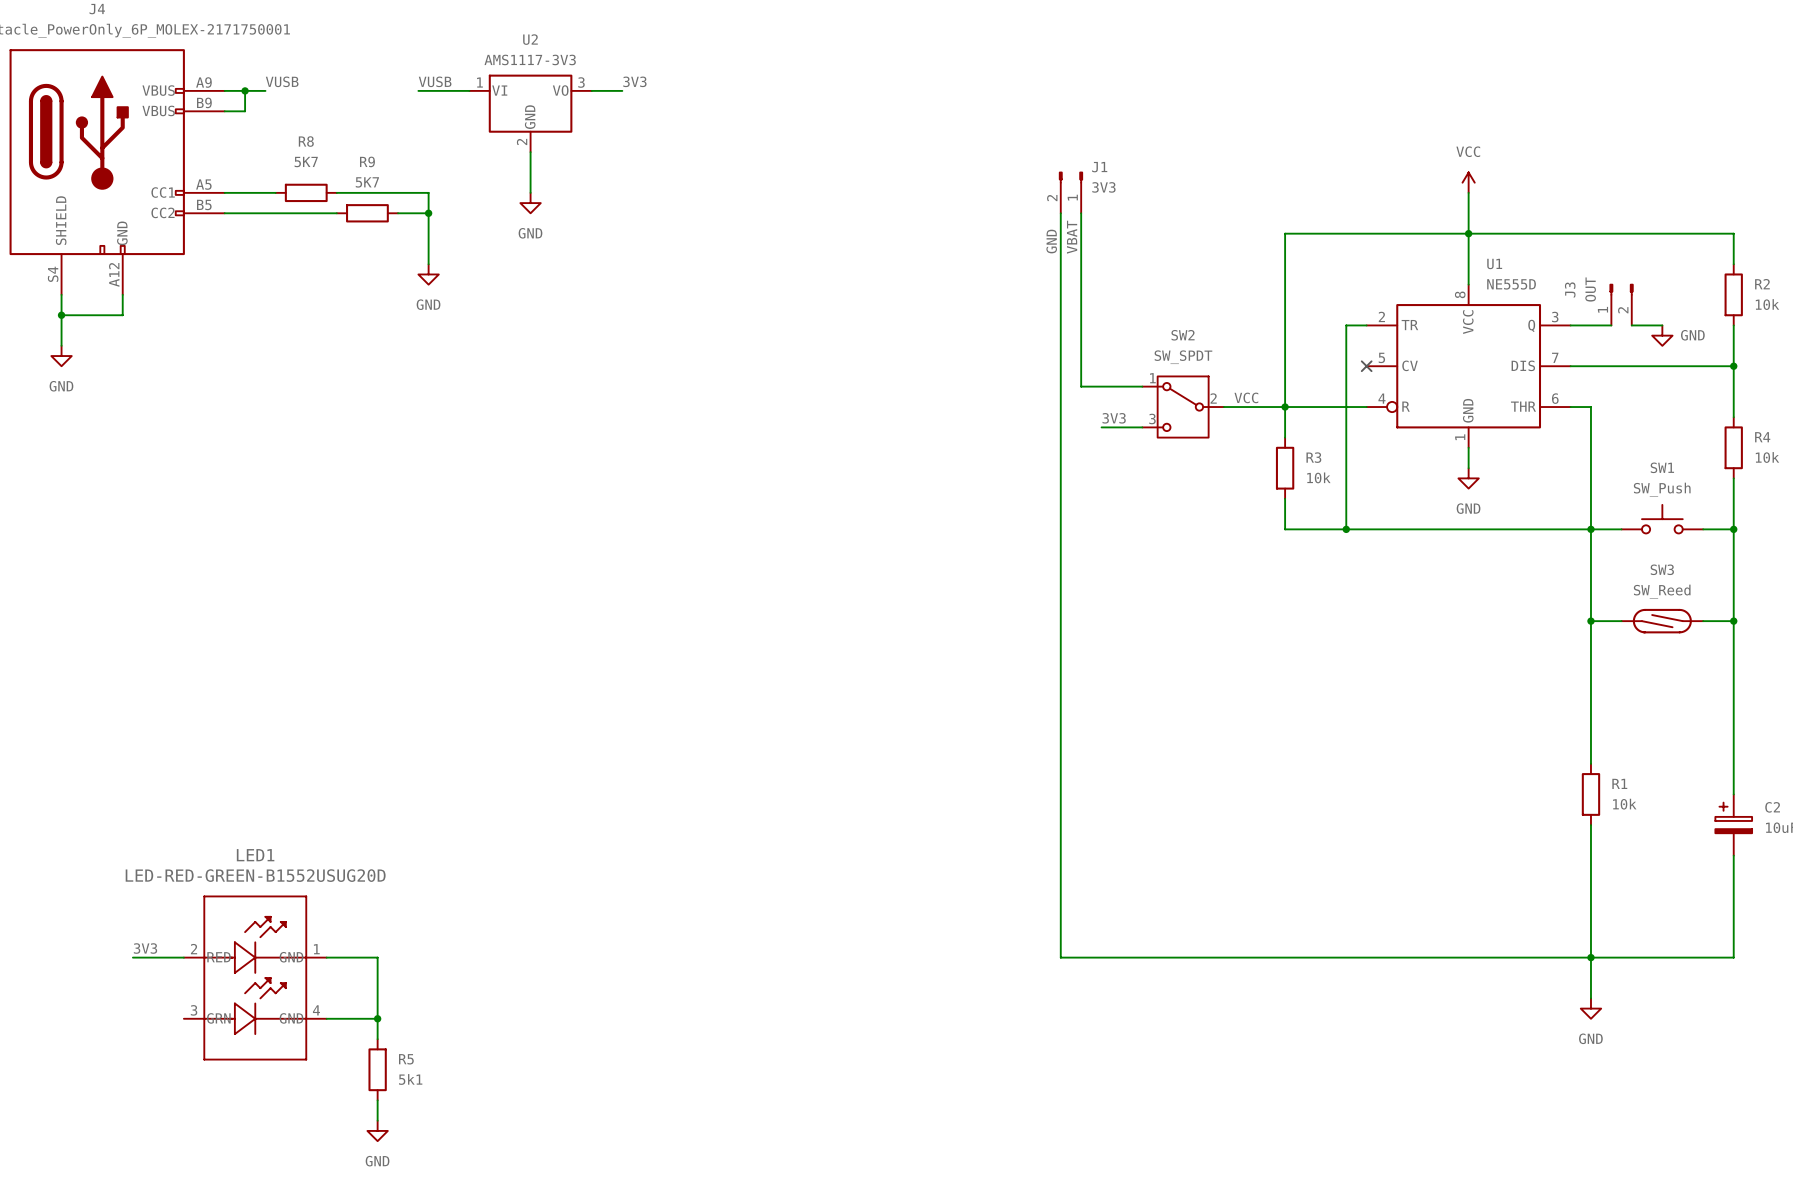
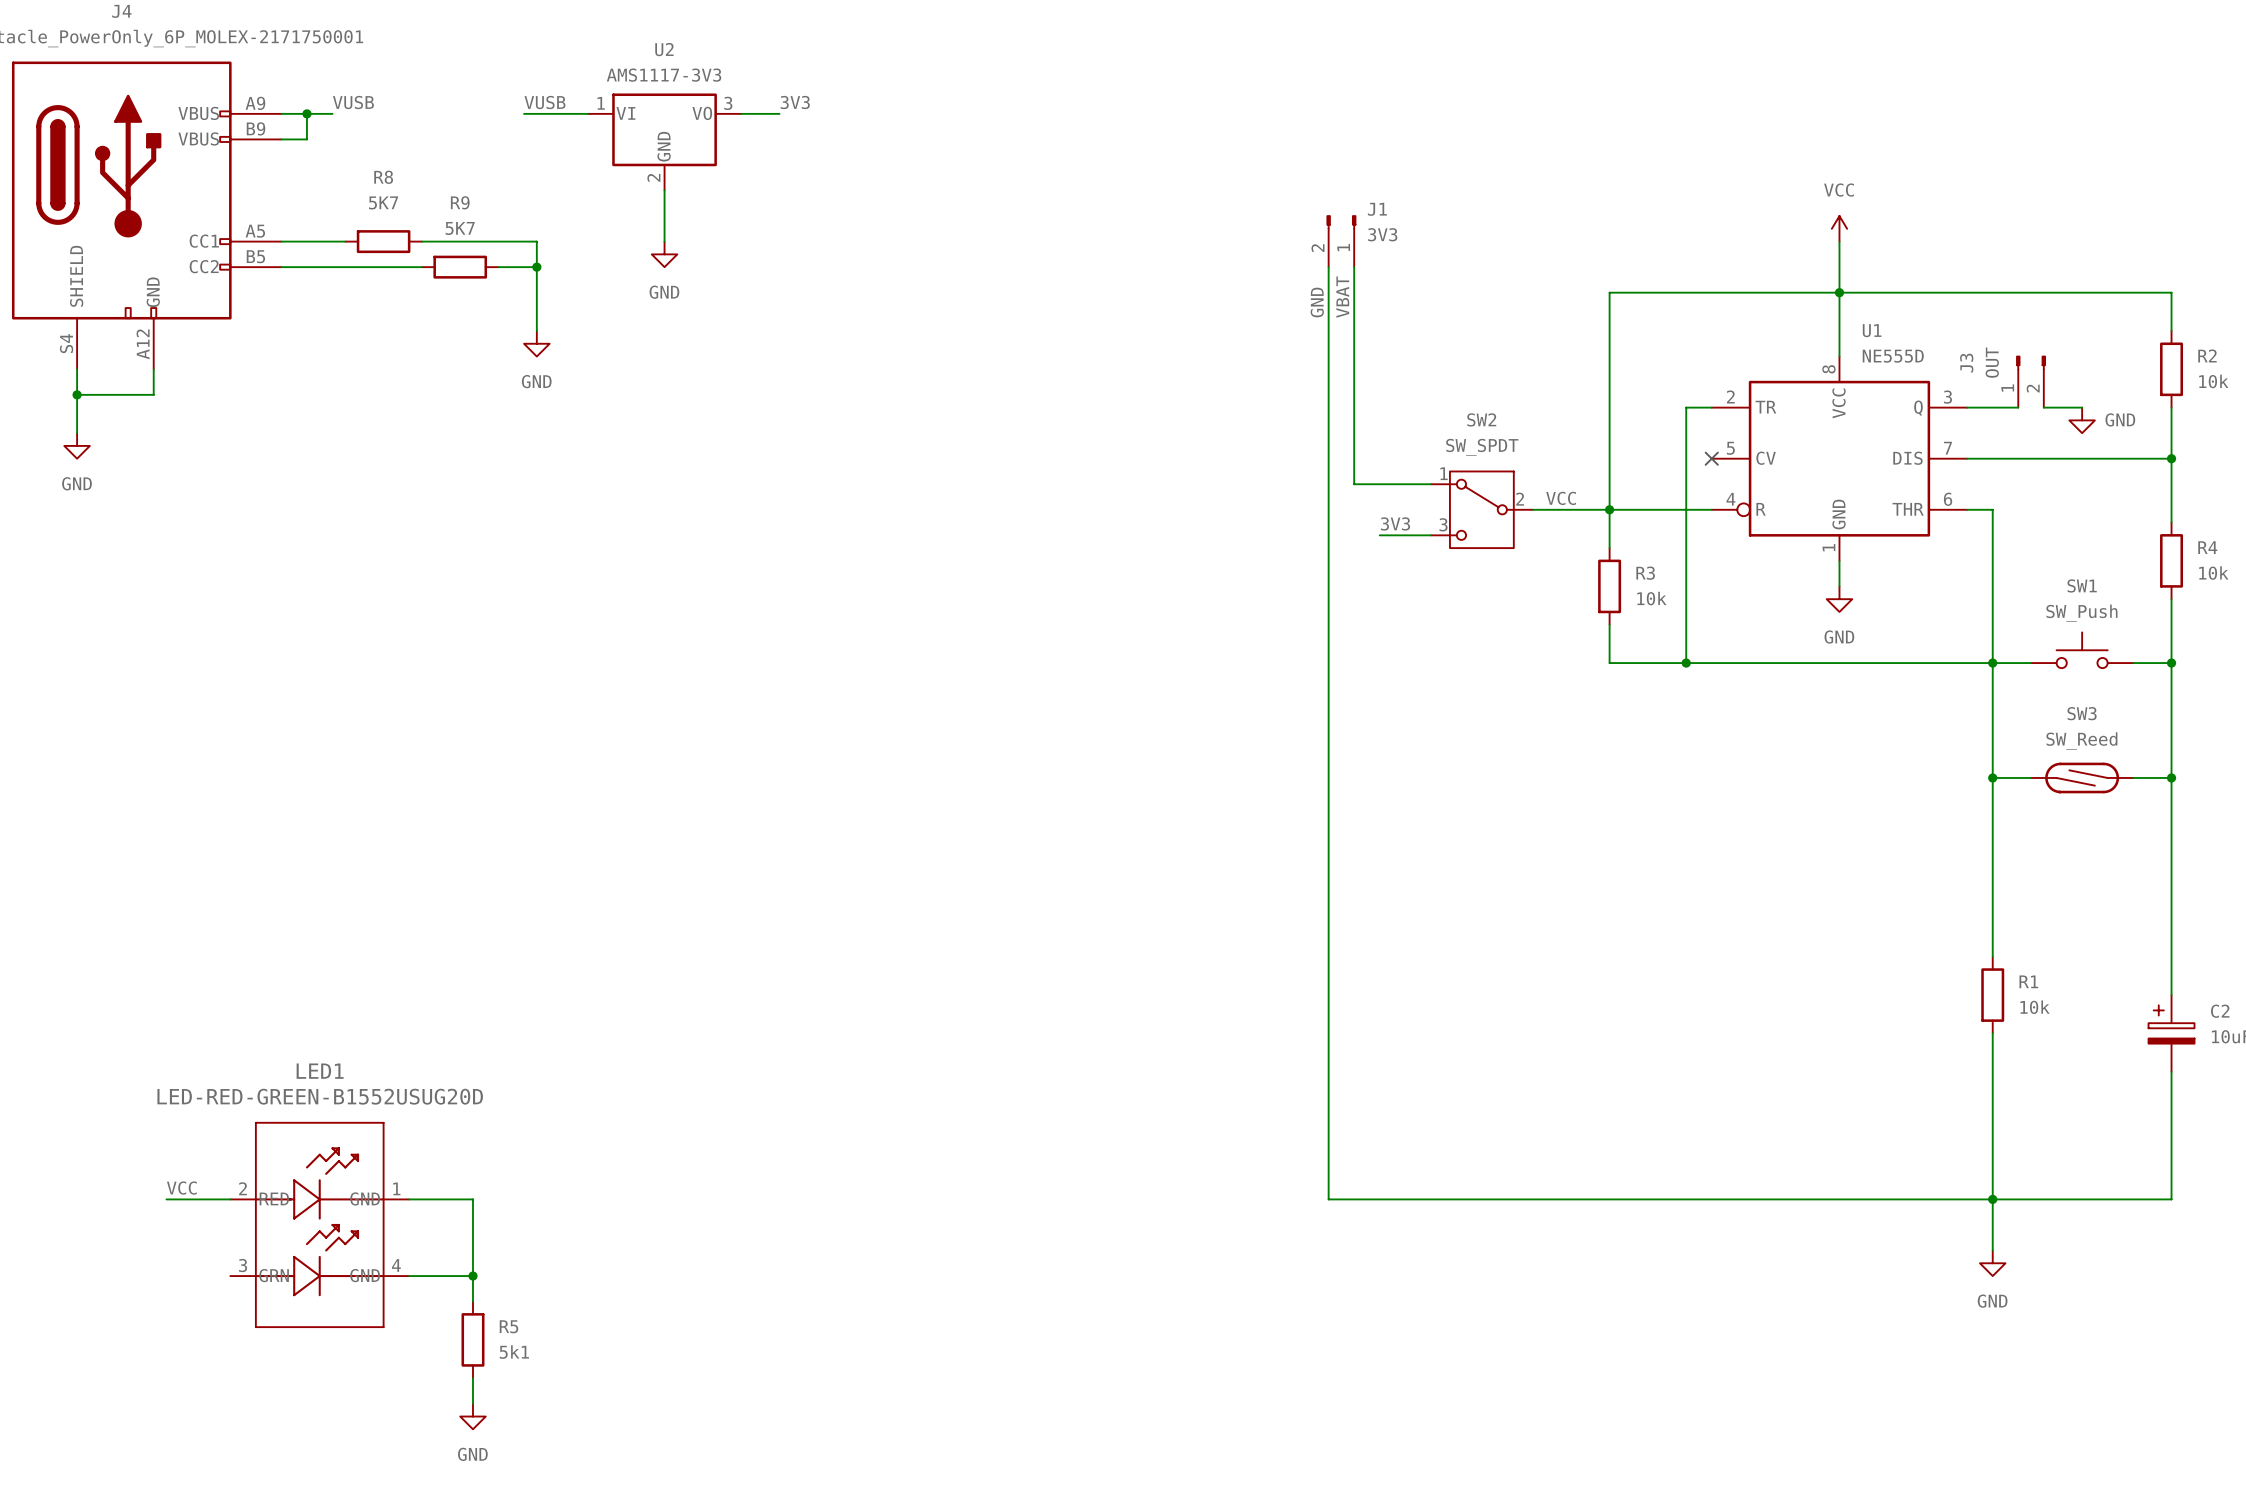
label: 3V3 (145, 948) -> VCC (181, 1188)

